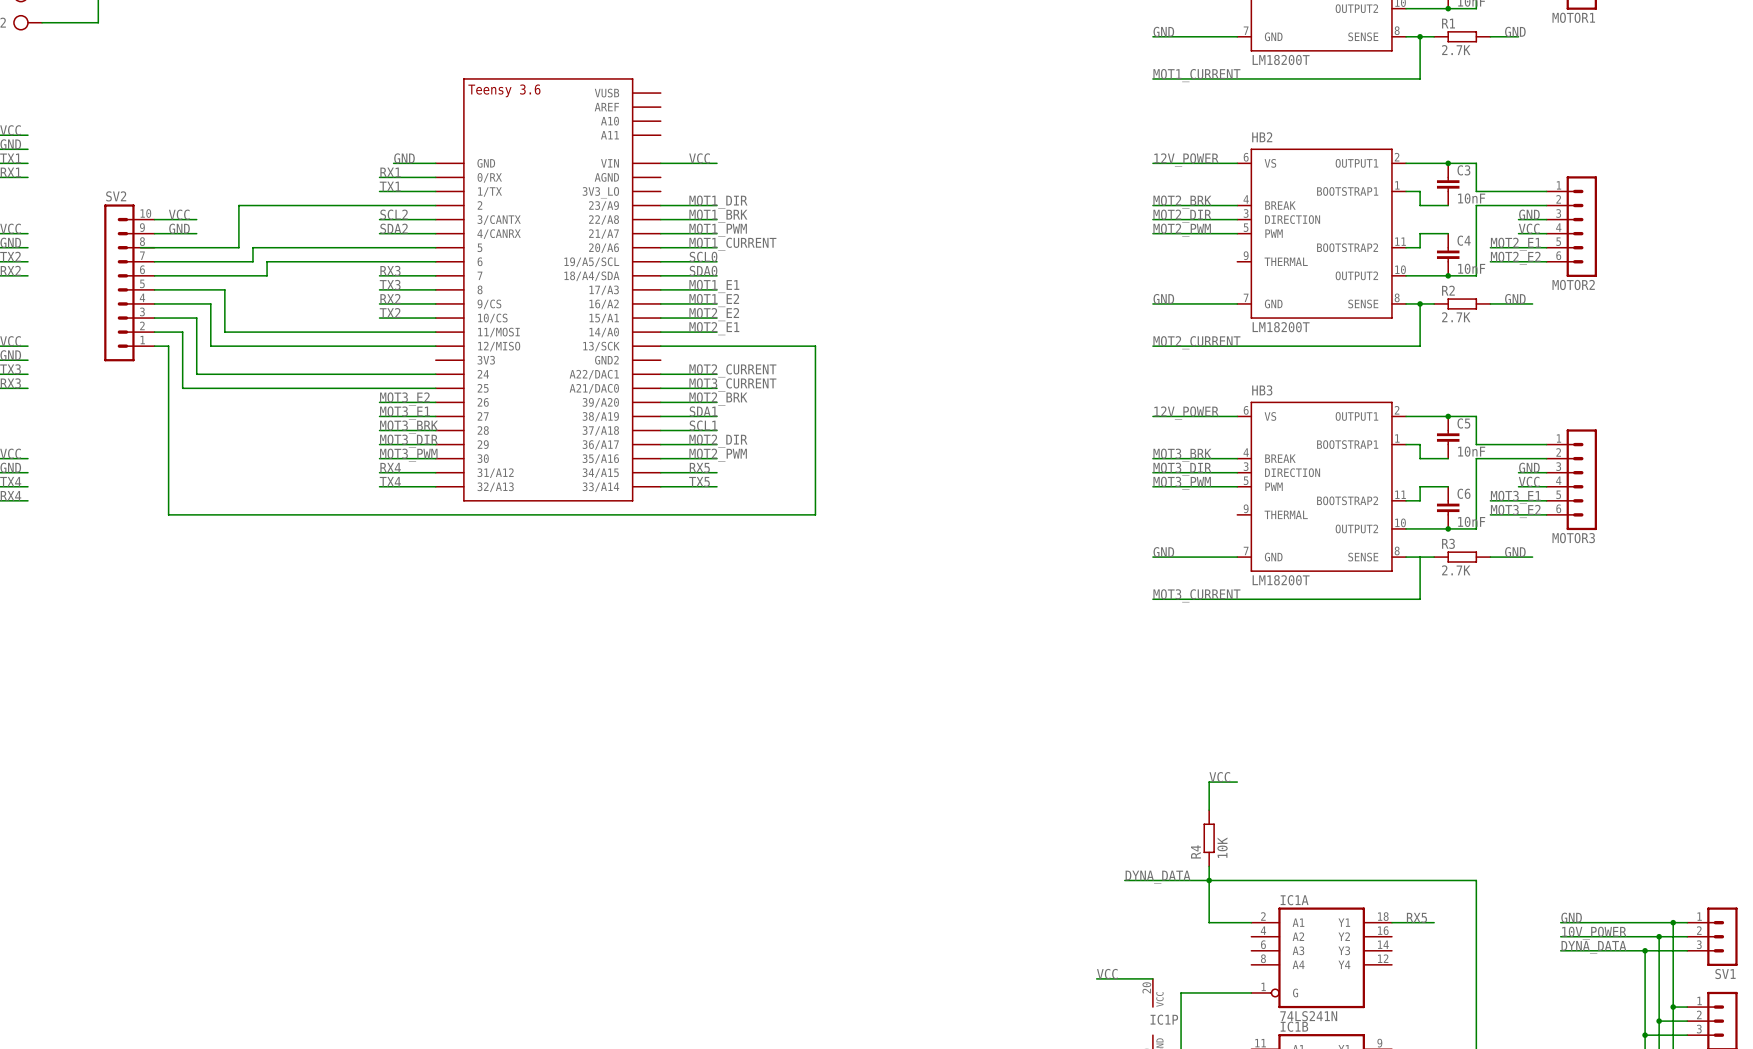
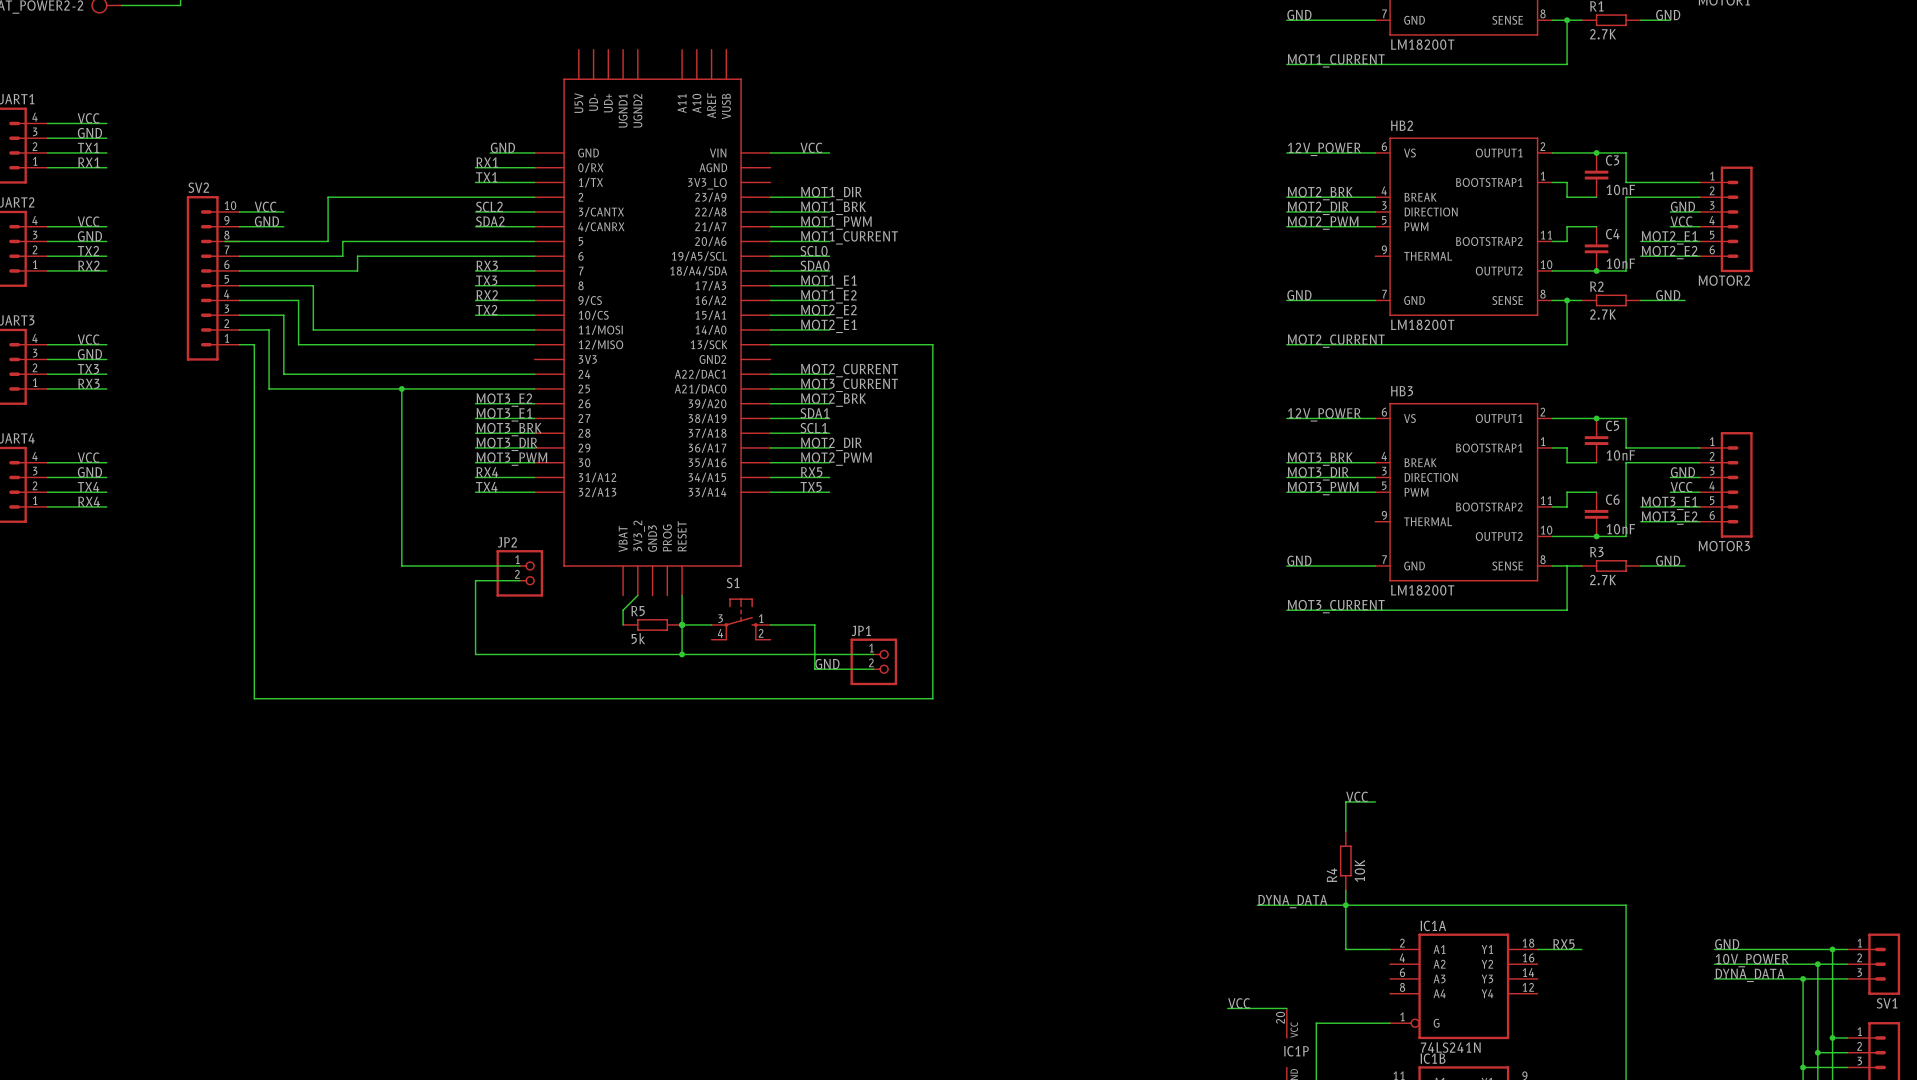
part: (548, 289) -> none
part: none -> (652, 322)
wire: none -> (401, 388) (401, 565) (519, 565)
junction: none -> (401, 388)
wire: (168, 514) (815, 514) -> (254, 521) (254, 698) (932, 698) (932, 521)
JP2: none -> (519, 573)
wire: none -> (519, 580) (475, 580) (475, 654) (873, 654)
wire: none -> (637, 595) (623, 610) (623, 624)
wire: none -> (682, 595) (682, 654)
S1: none -> (741, 619)
R5: none -> 5k (652, 624)
wire: none -> (682, 624) (711, 624)
junction: none -> (682, 624)
wire: none -> (770, 624) (814, 624) (814, 669) (873, 669)
junction: none -> (682, 654)
JP1: none -> (873, 661)
label: none -> GND (827, 664)

